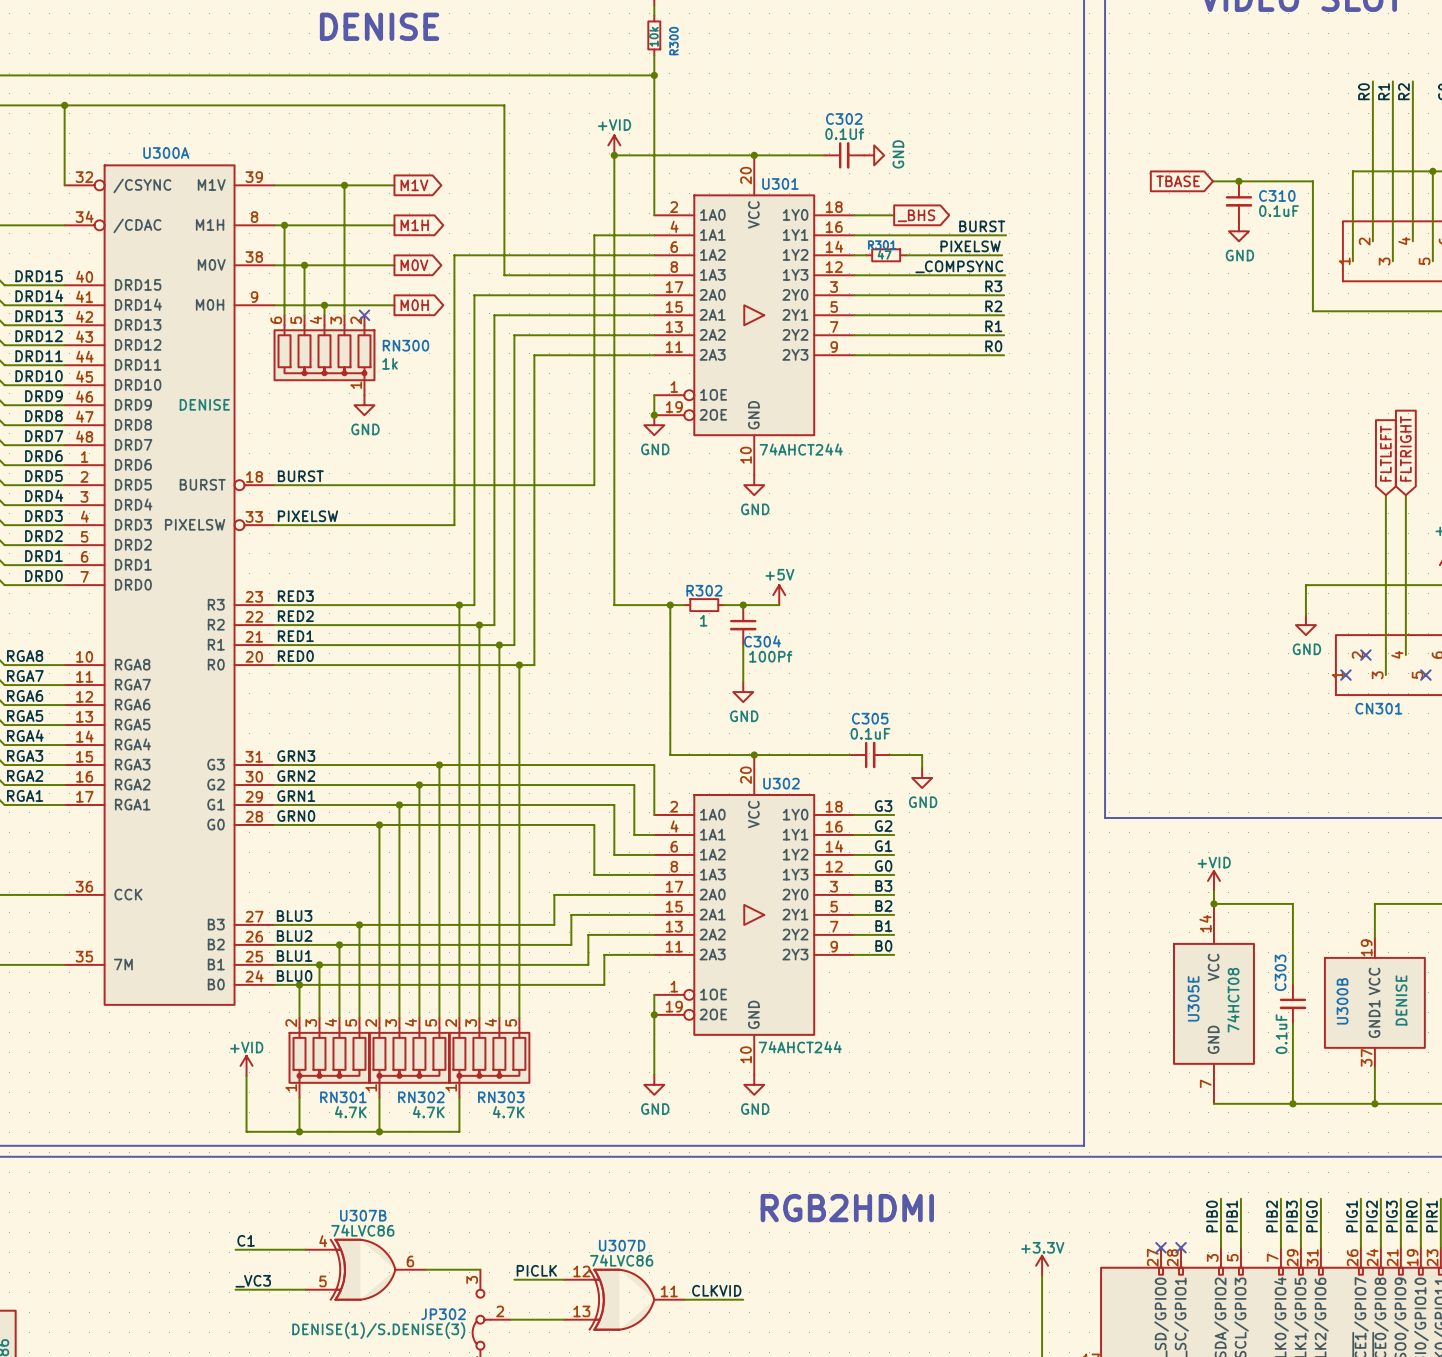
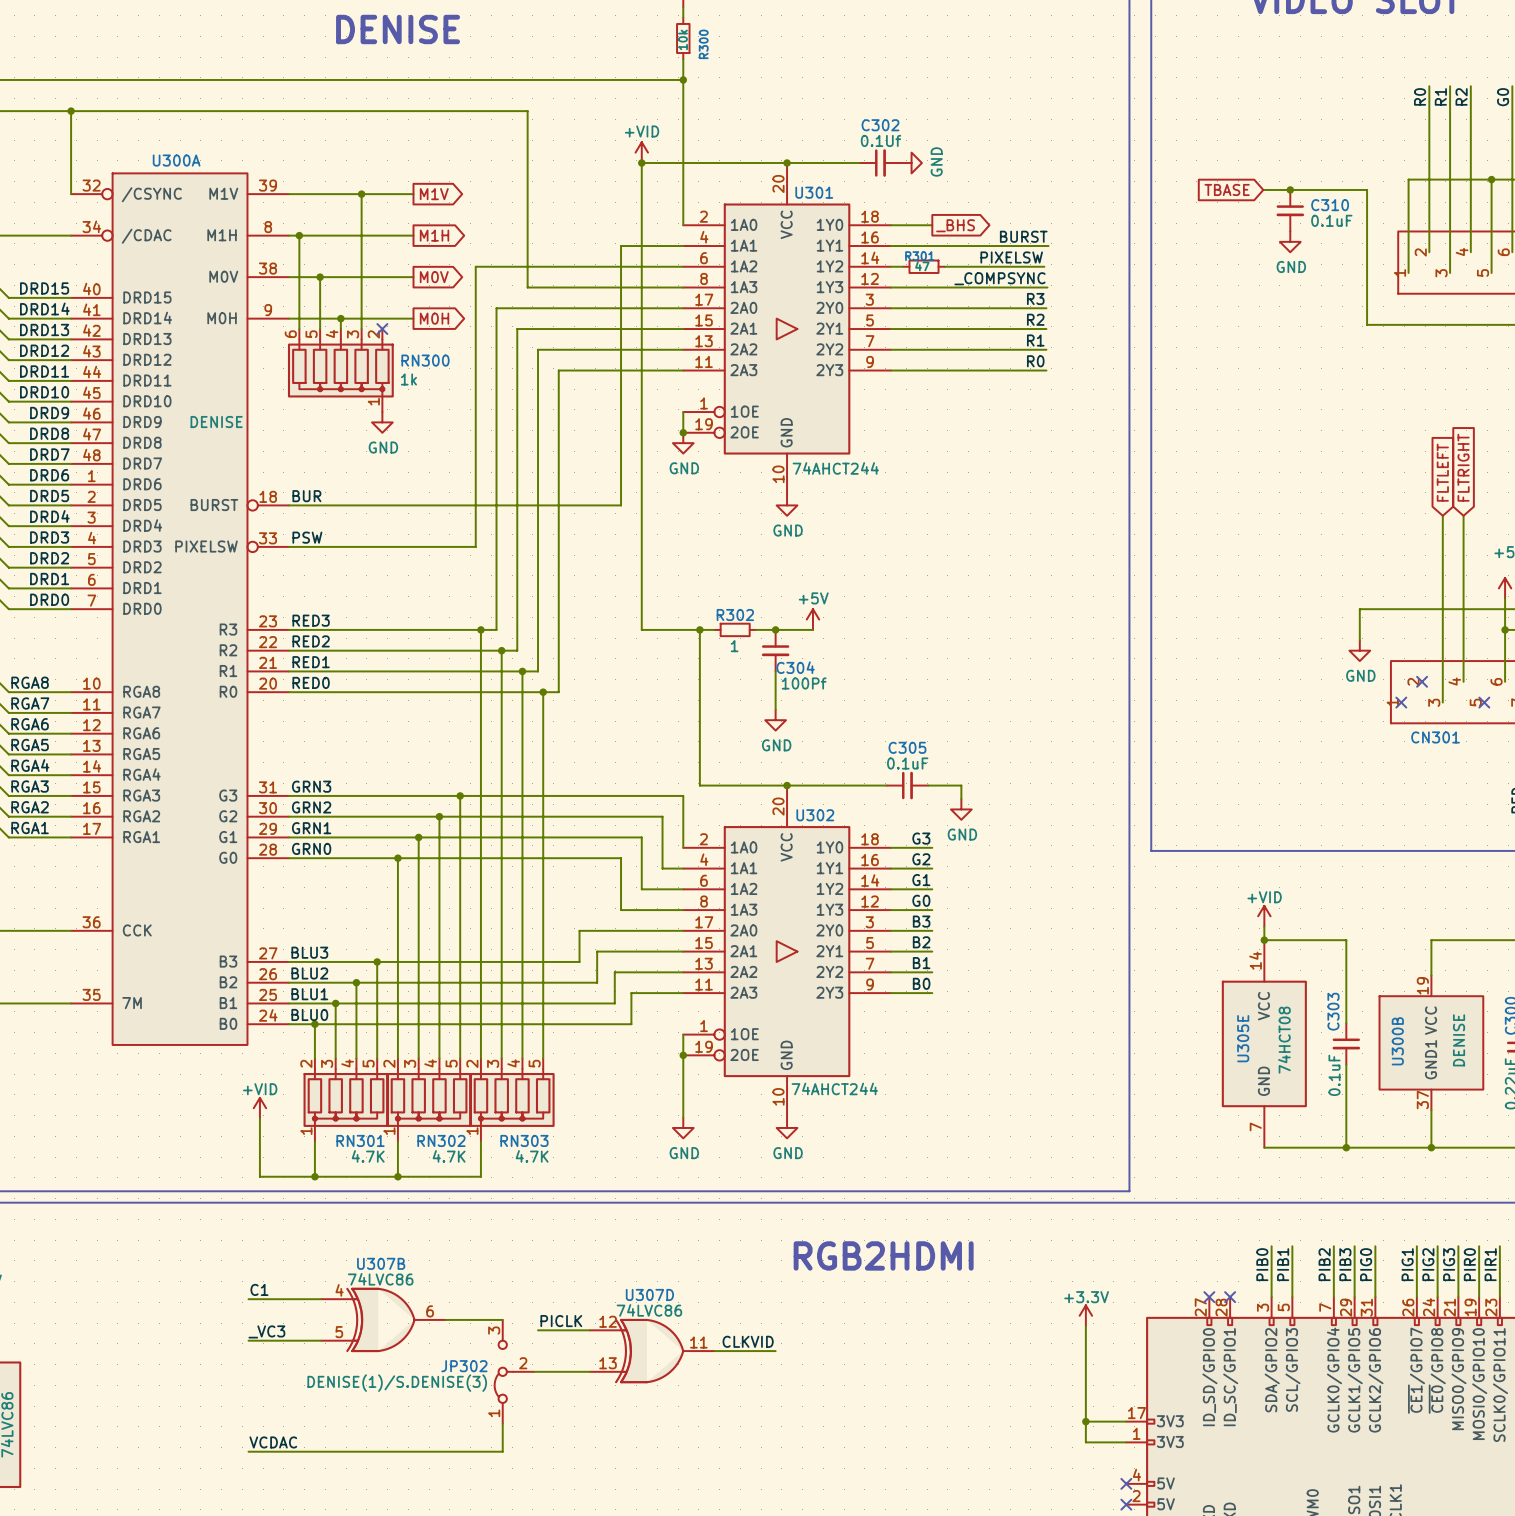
label: BURST (300, 476) -> BUR (306, 496)
label: PIXELSW (307, 516) -> PSW (307, 537)

